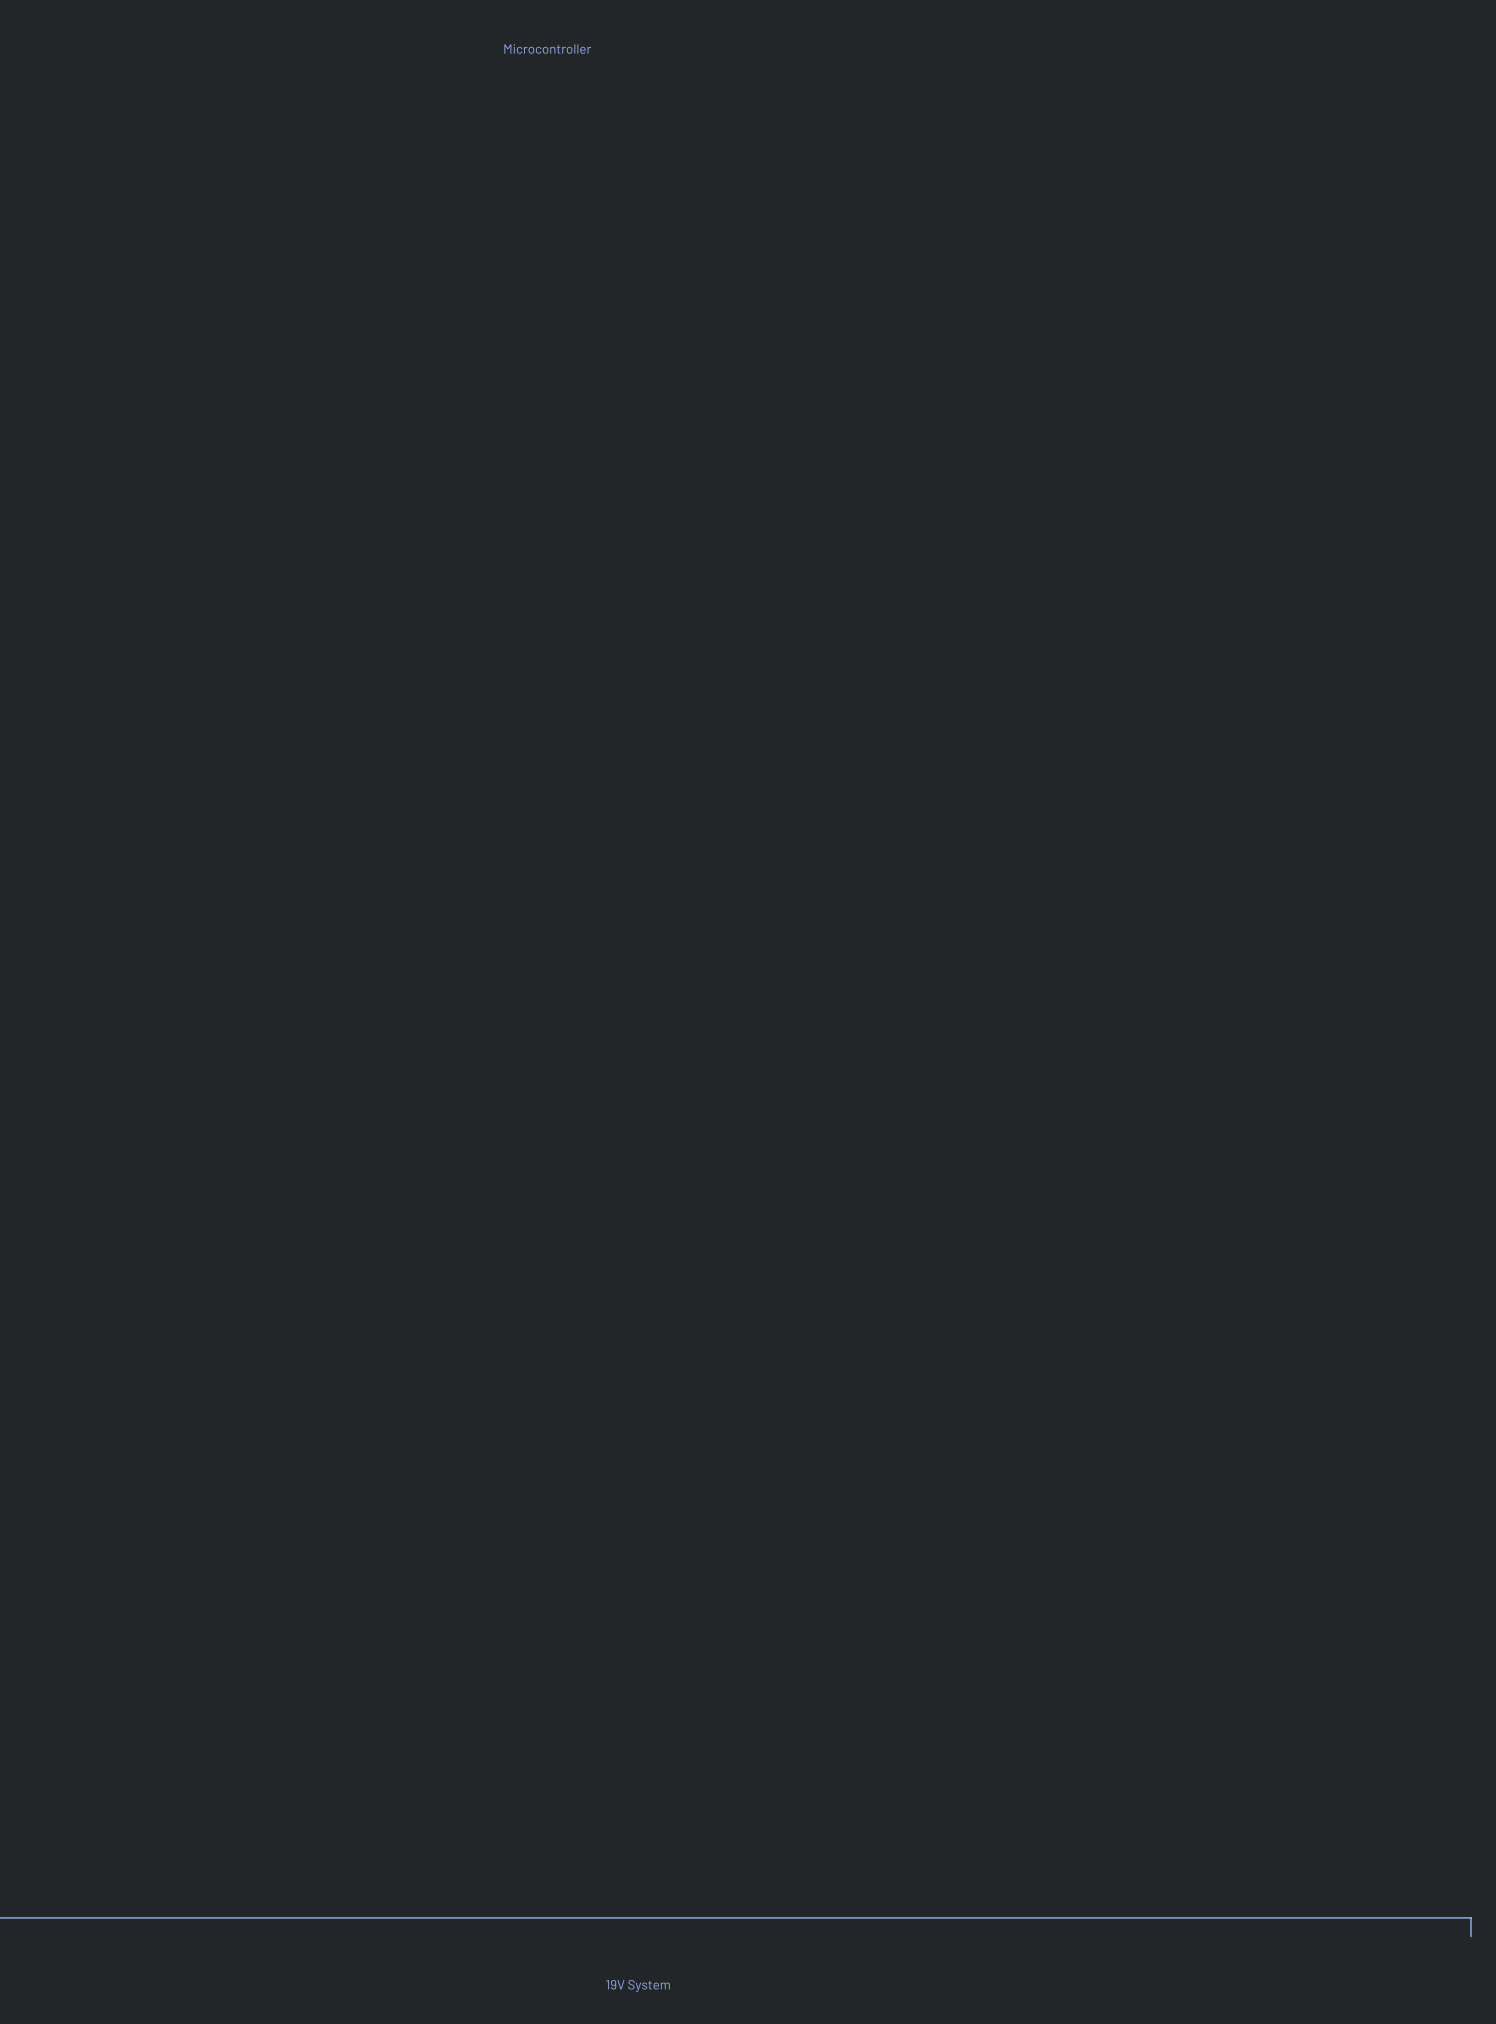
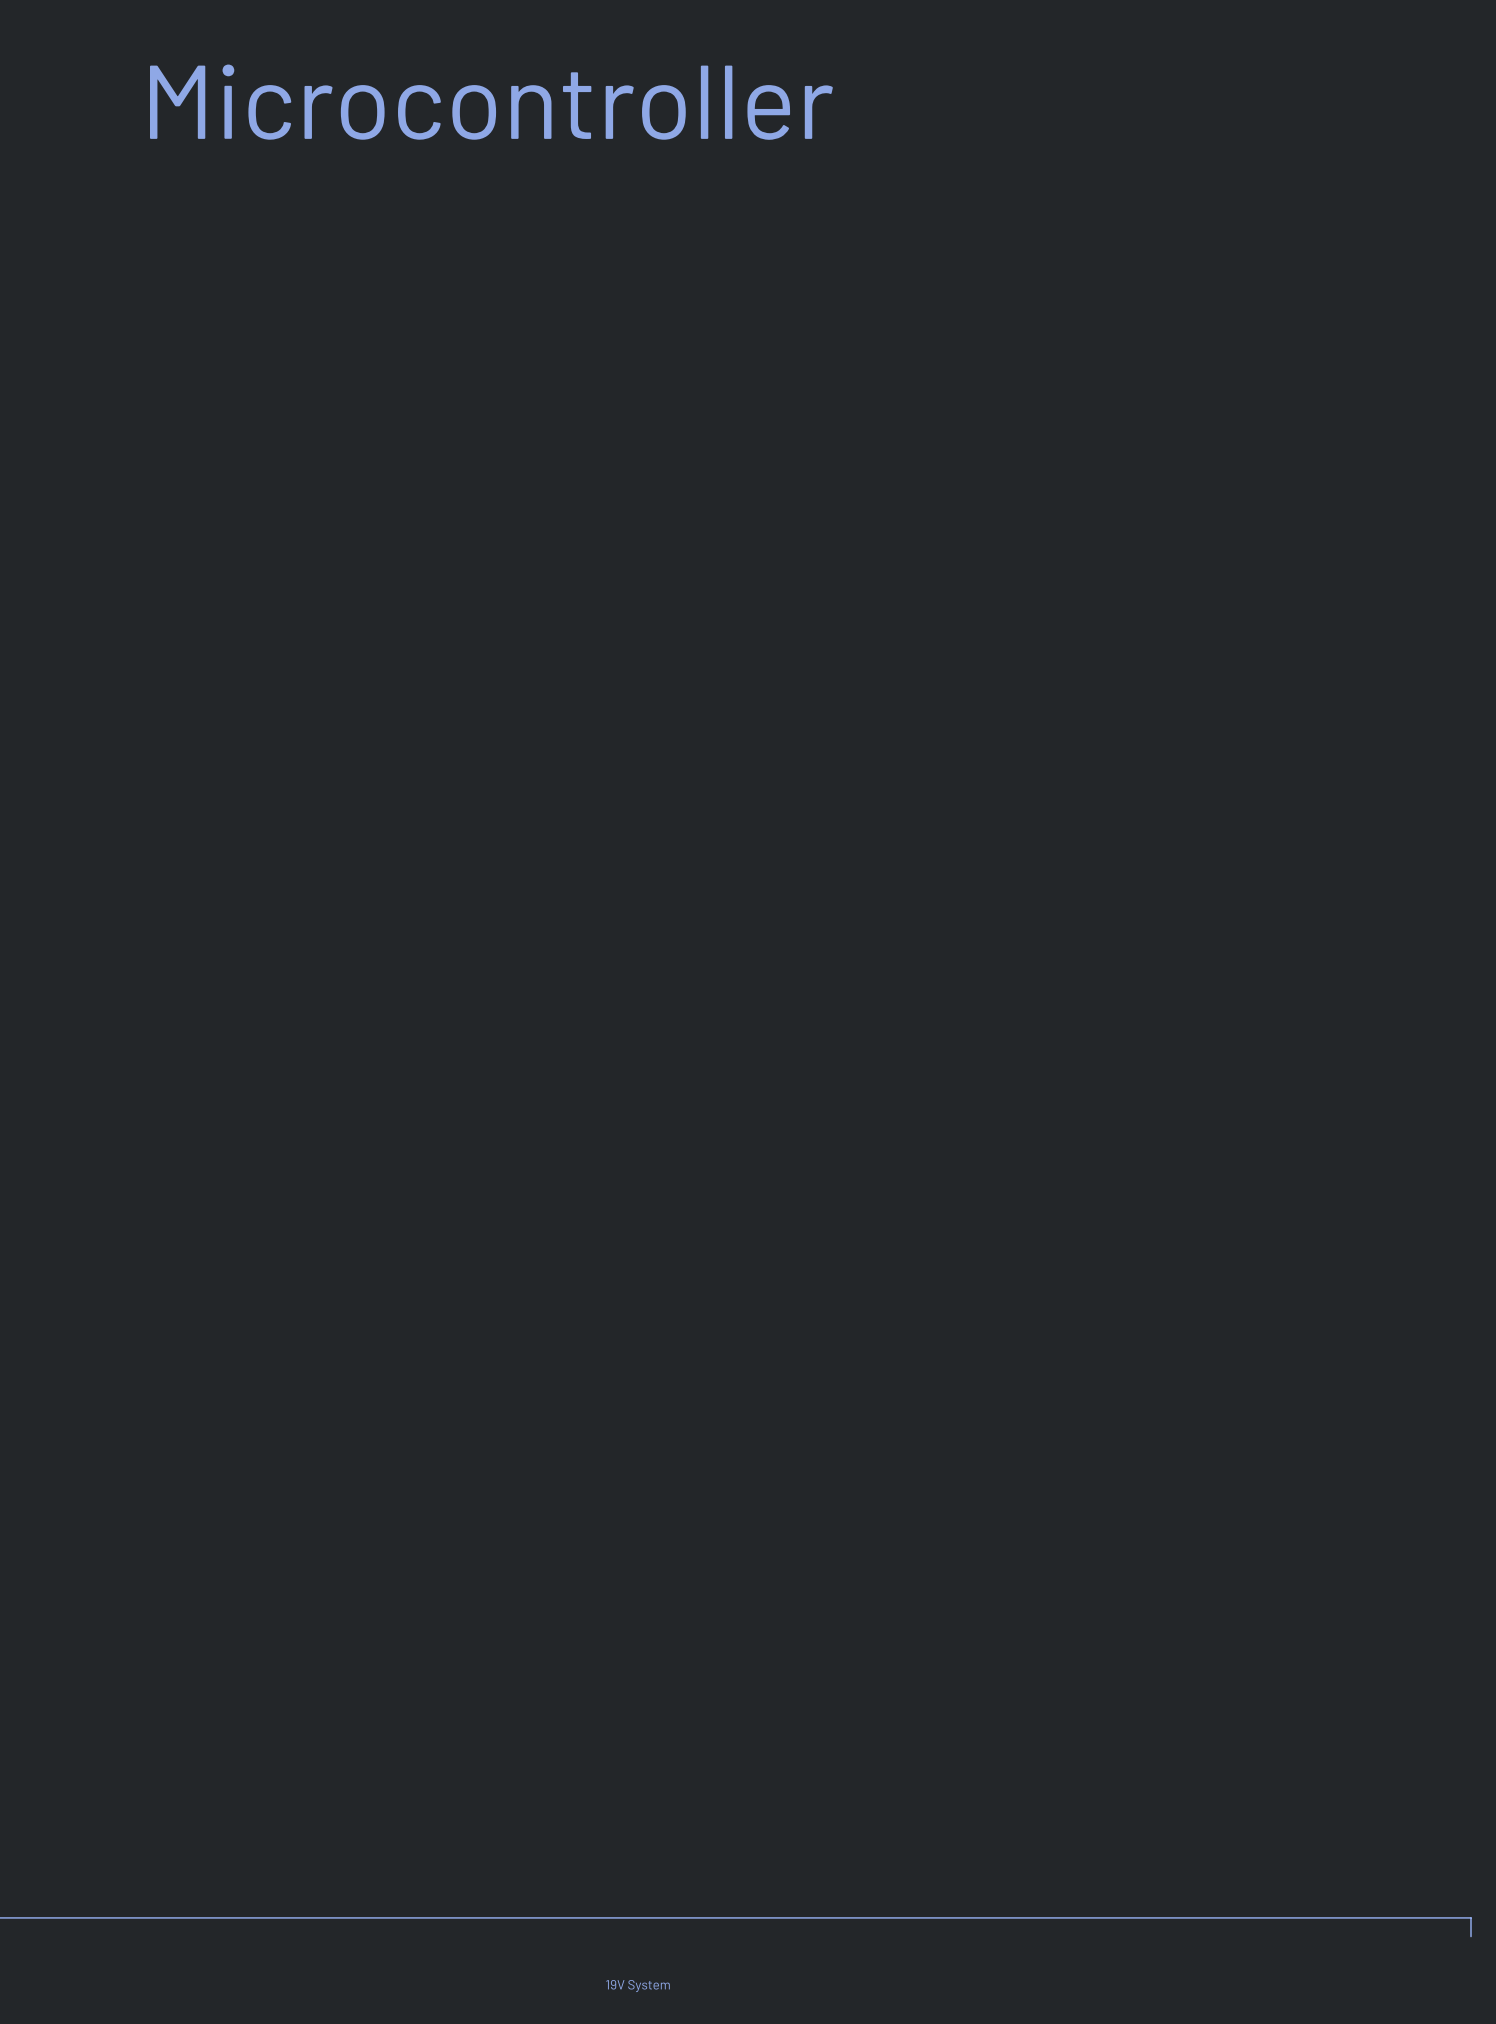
text: Microcontroller (547, 48) -> none
text: none -> Microcontroller (491, 102)

